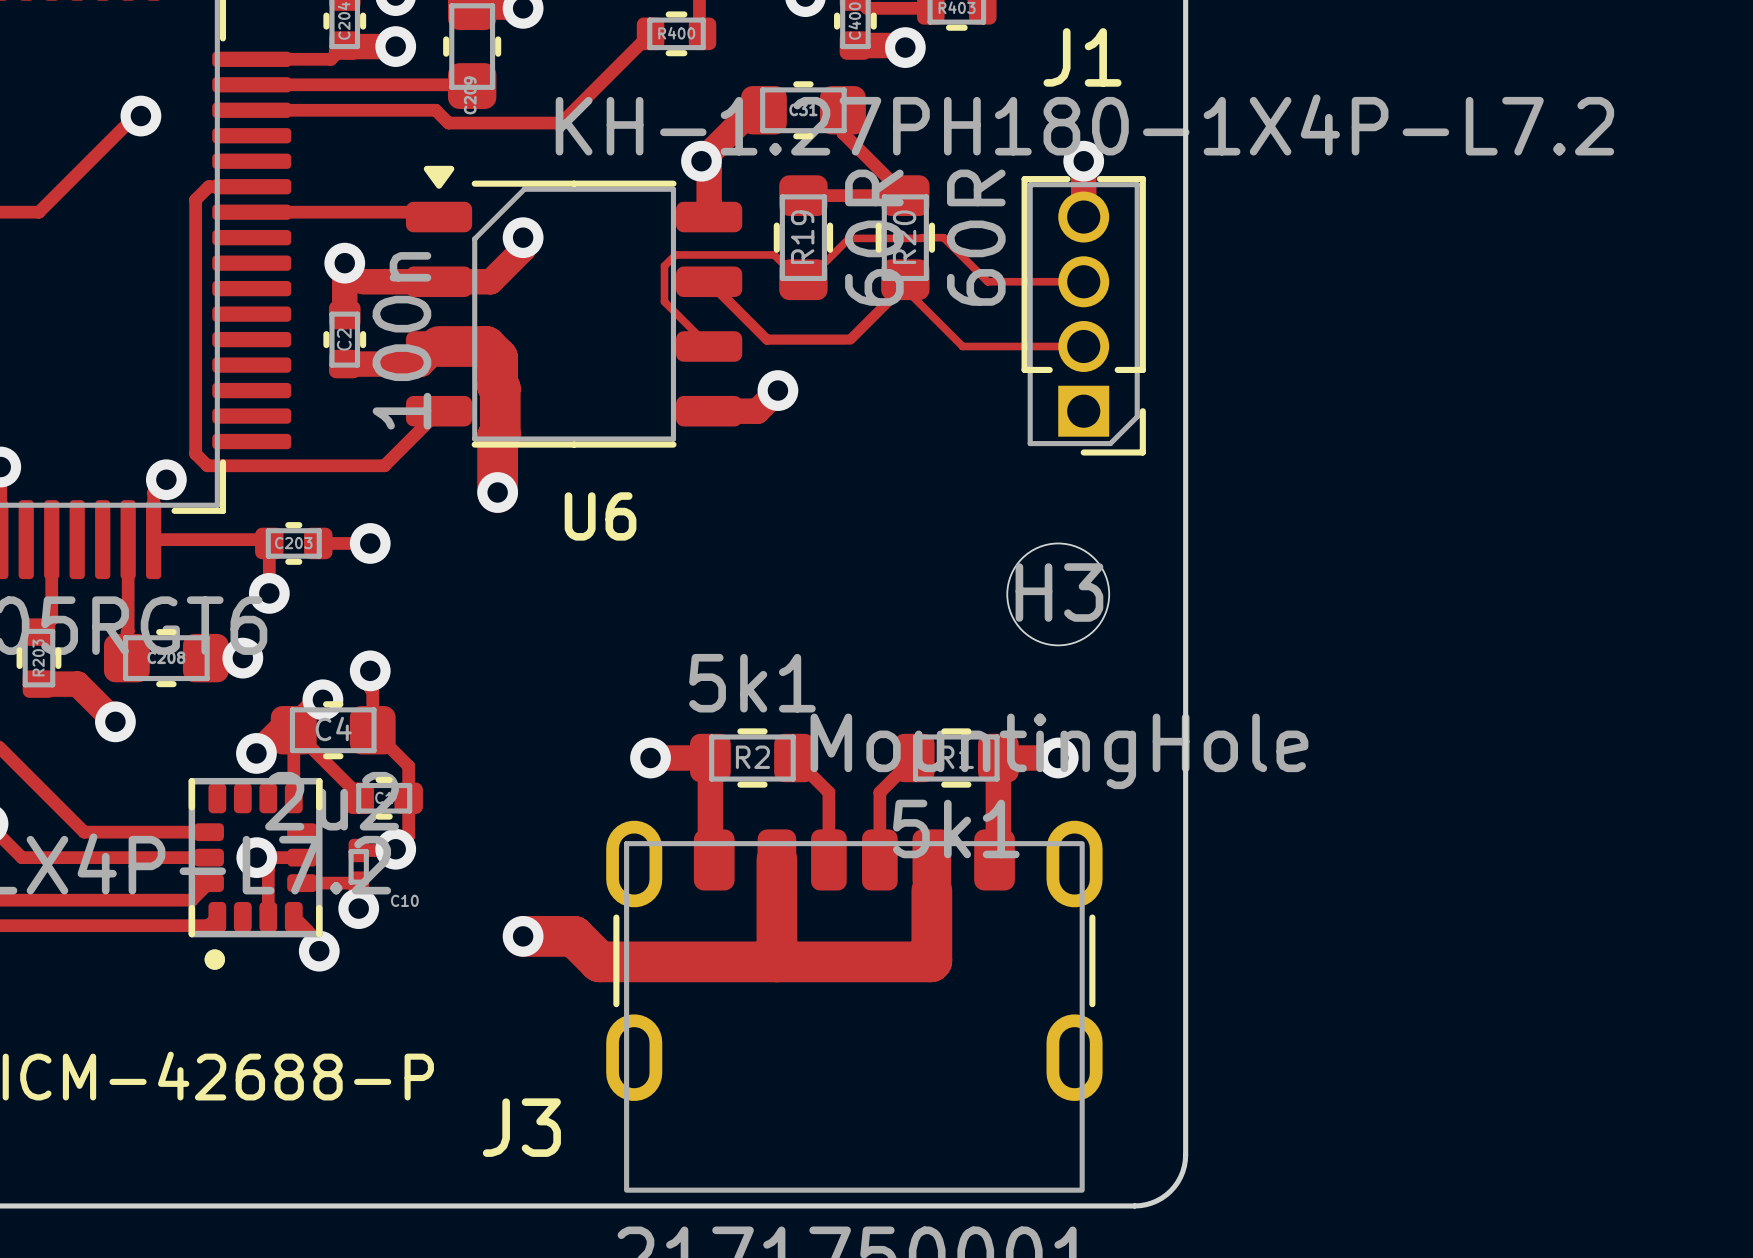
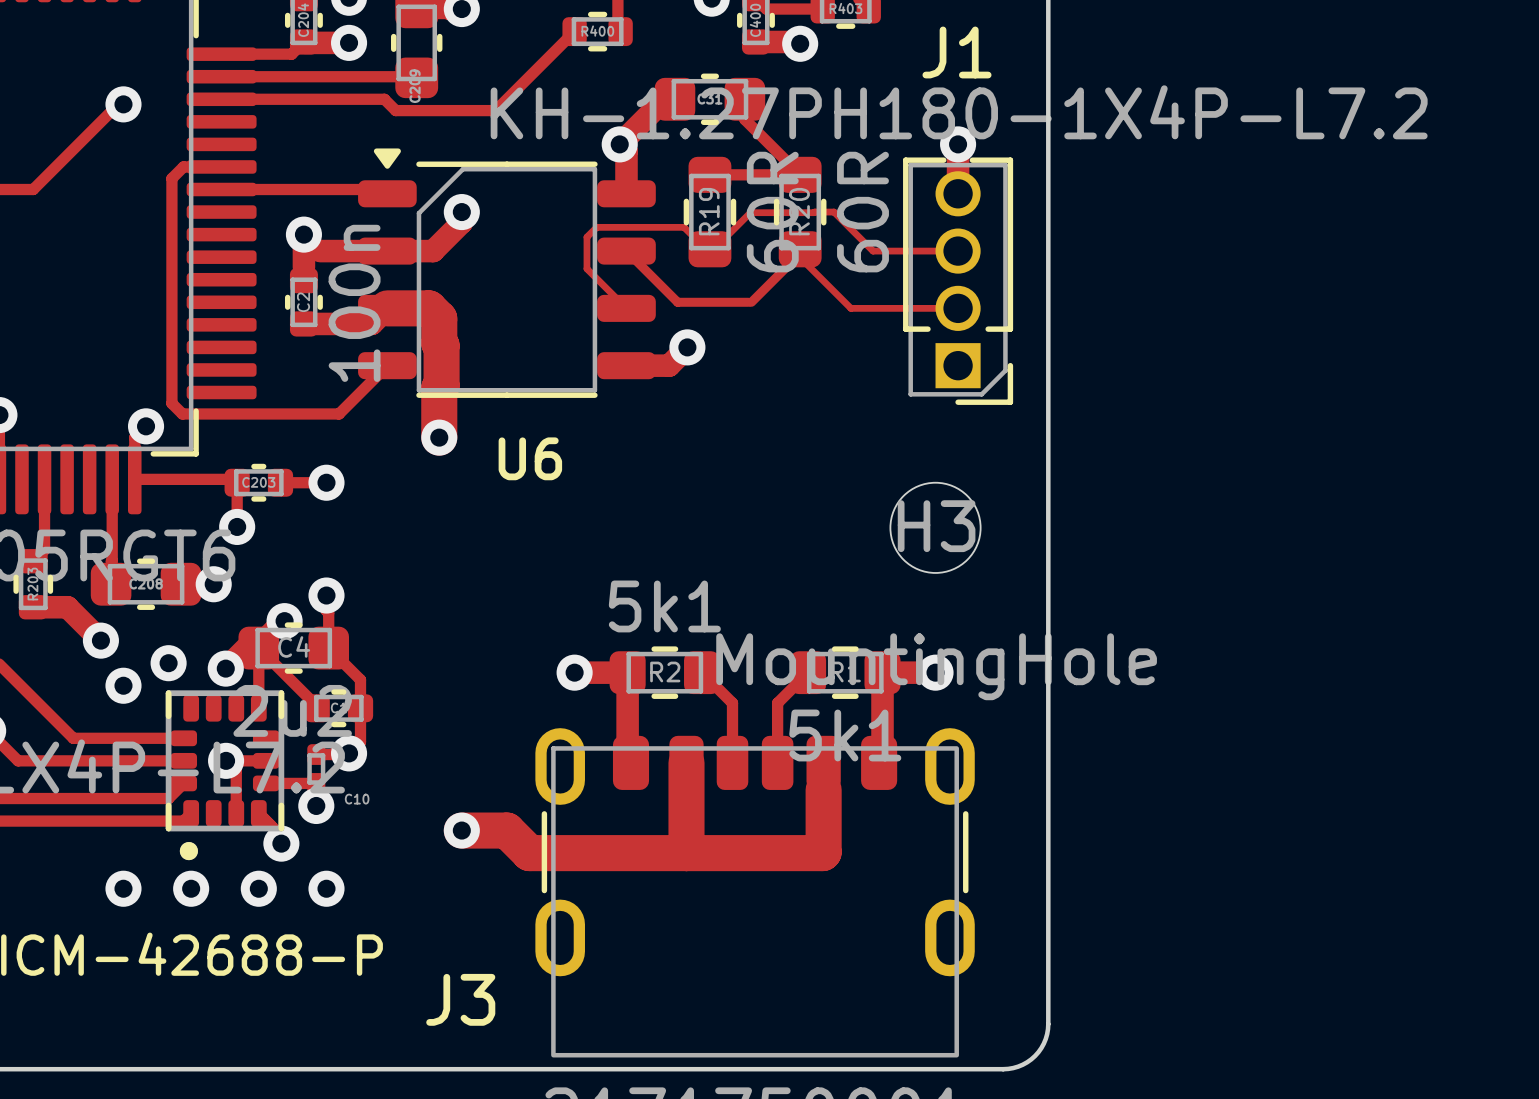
via: none -> (168, 663)
via: none -> (123, 685)
via: none -> (123, 888)
via: none -> (191, 888)
via: none -> (258, 888)
via: none -> (326, 888)

